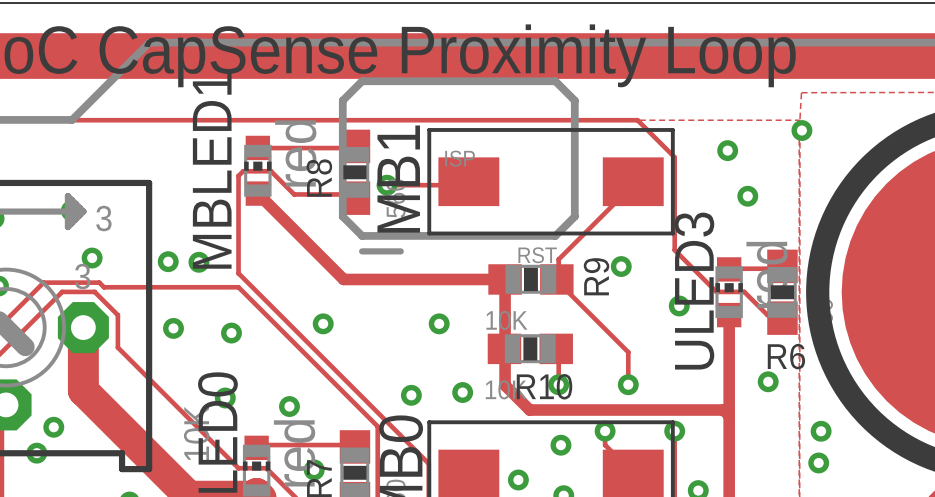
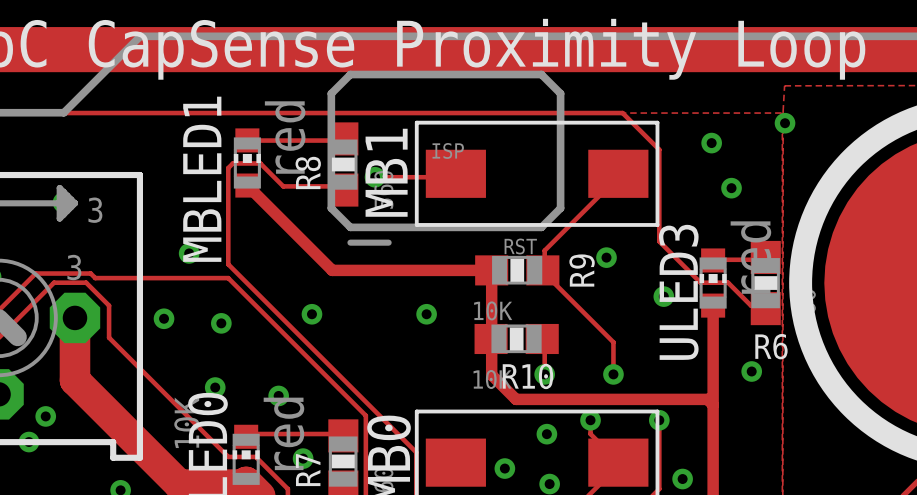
via: (92, 258) -> none
via: (168, 261) -> none
via: (462, 392) -> none
via: (411, 395) -> none
via: (821, 431) -> none
via: (818, 462) -> none

